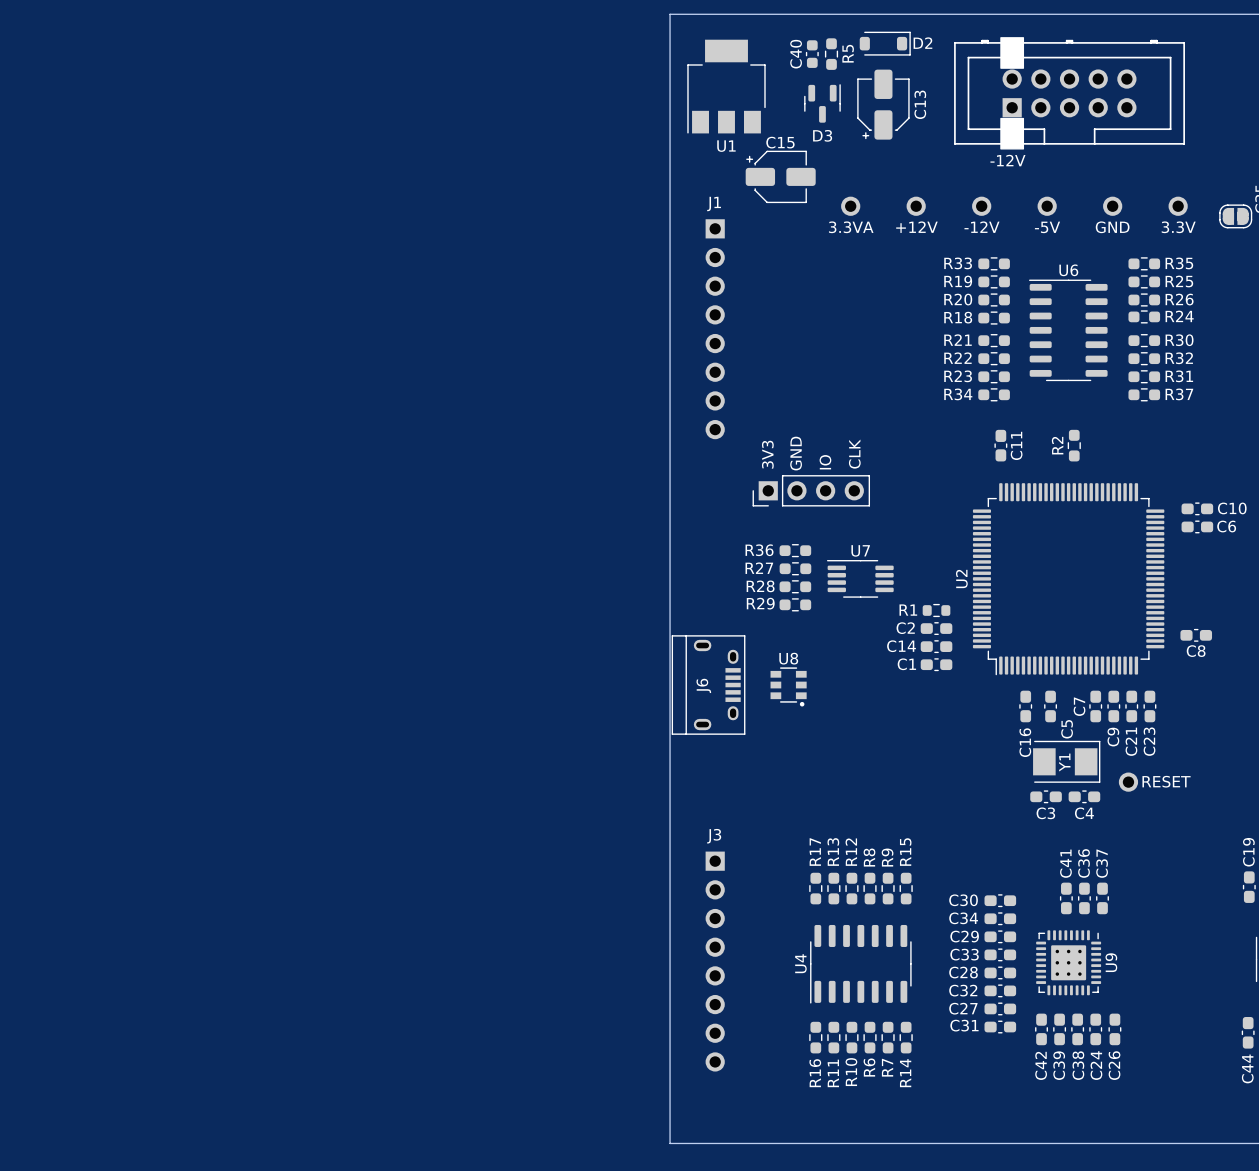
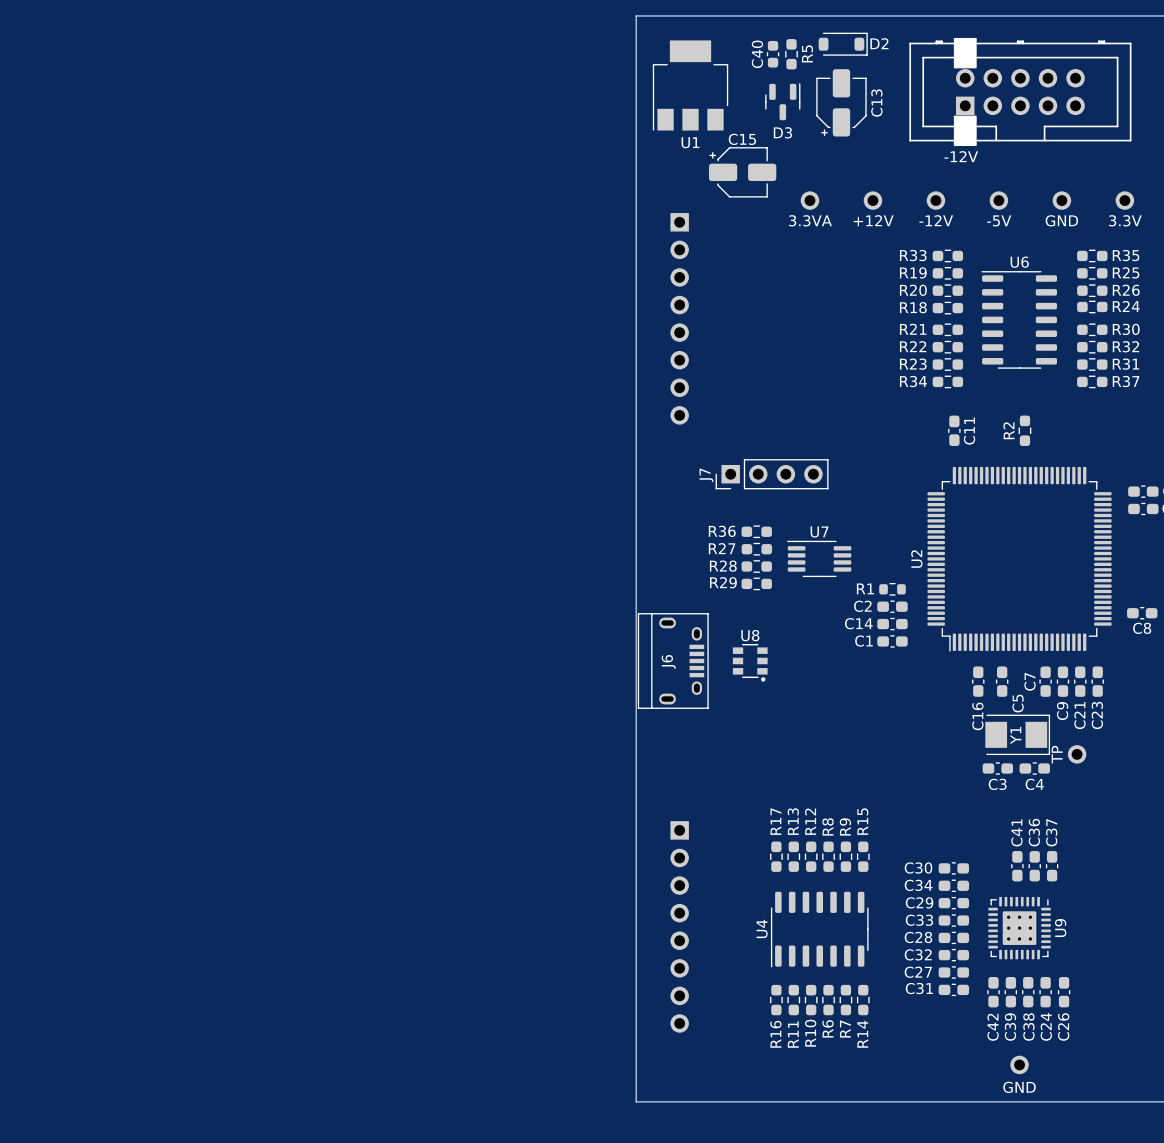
text: J1 (714, 203) -> none
text: GND (796, 453) -> none
text: 3V3 (767, 454) -> none
text: CLK (854, 454) -> none
text: IO (825, 462) -> none
J7 name: none -> J7 (706, 475)
part text: RESET (1166, 781) -> none
part text: none -> TP (1057, 754)
text: J3 (714, 836) -> none
part: none -> (1019, 1064)

